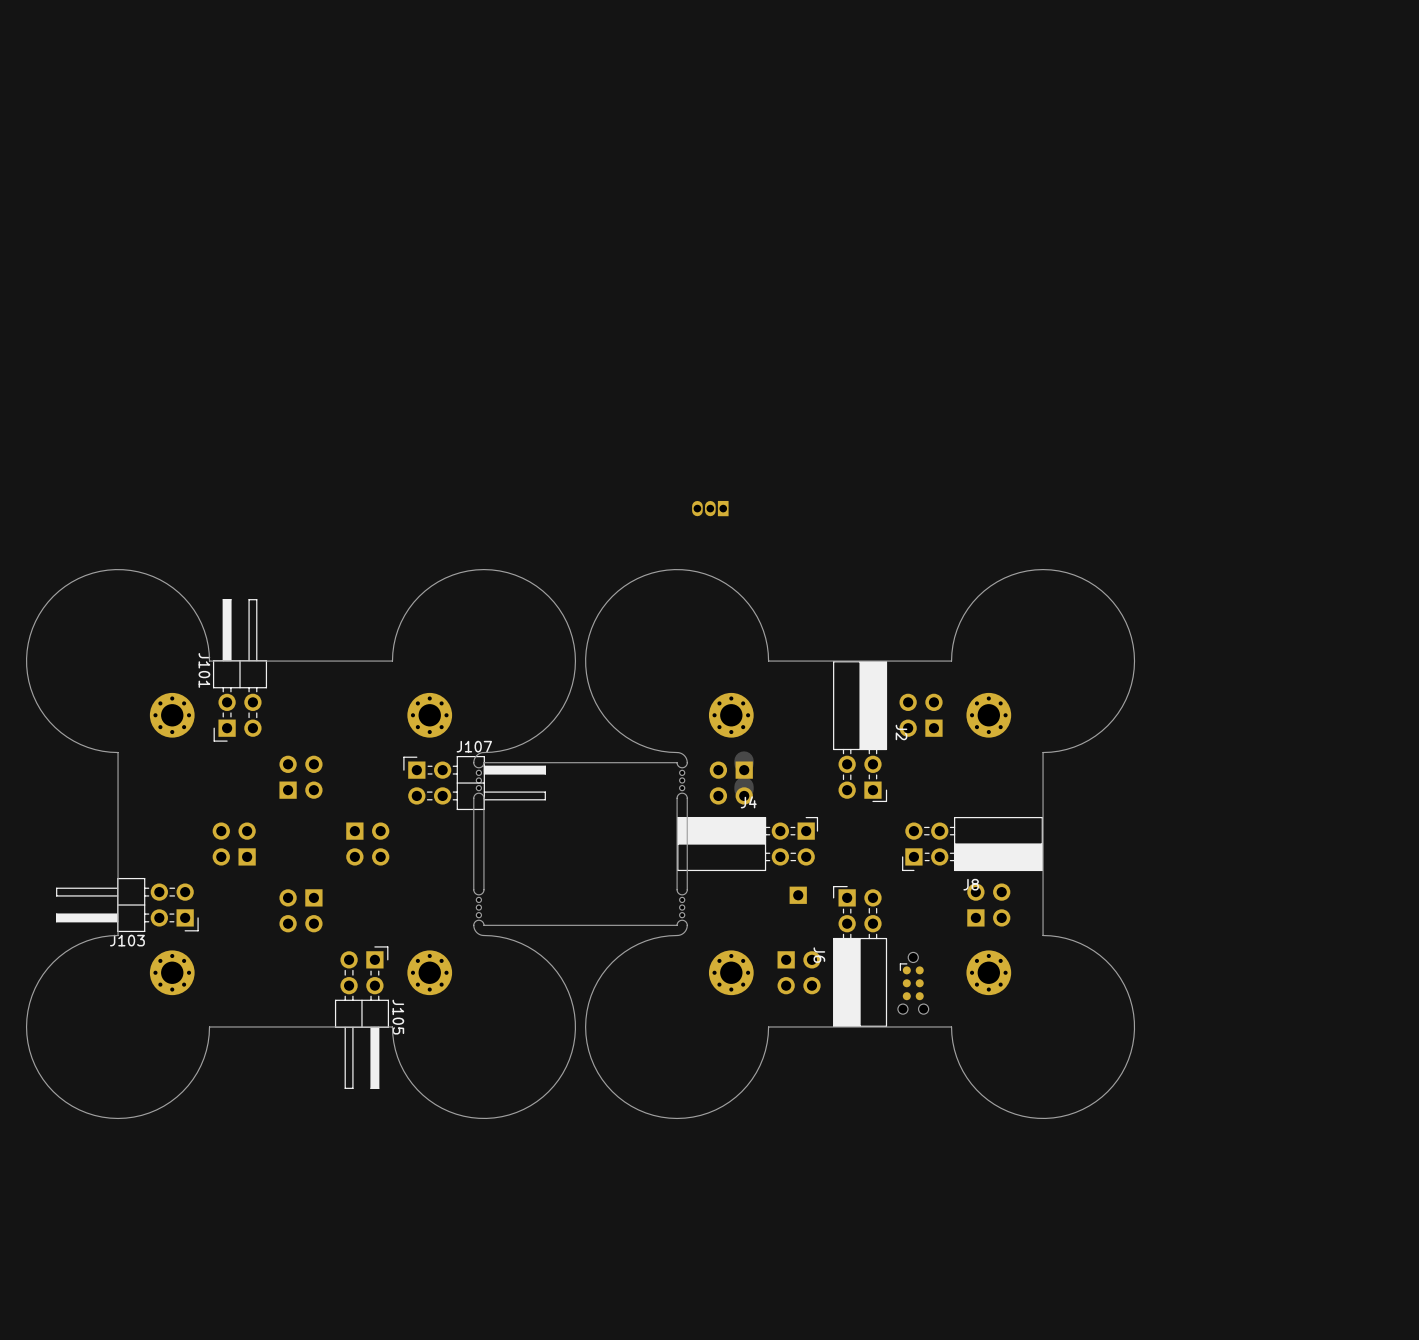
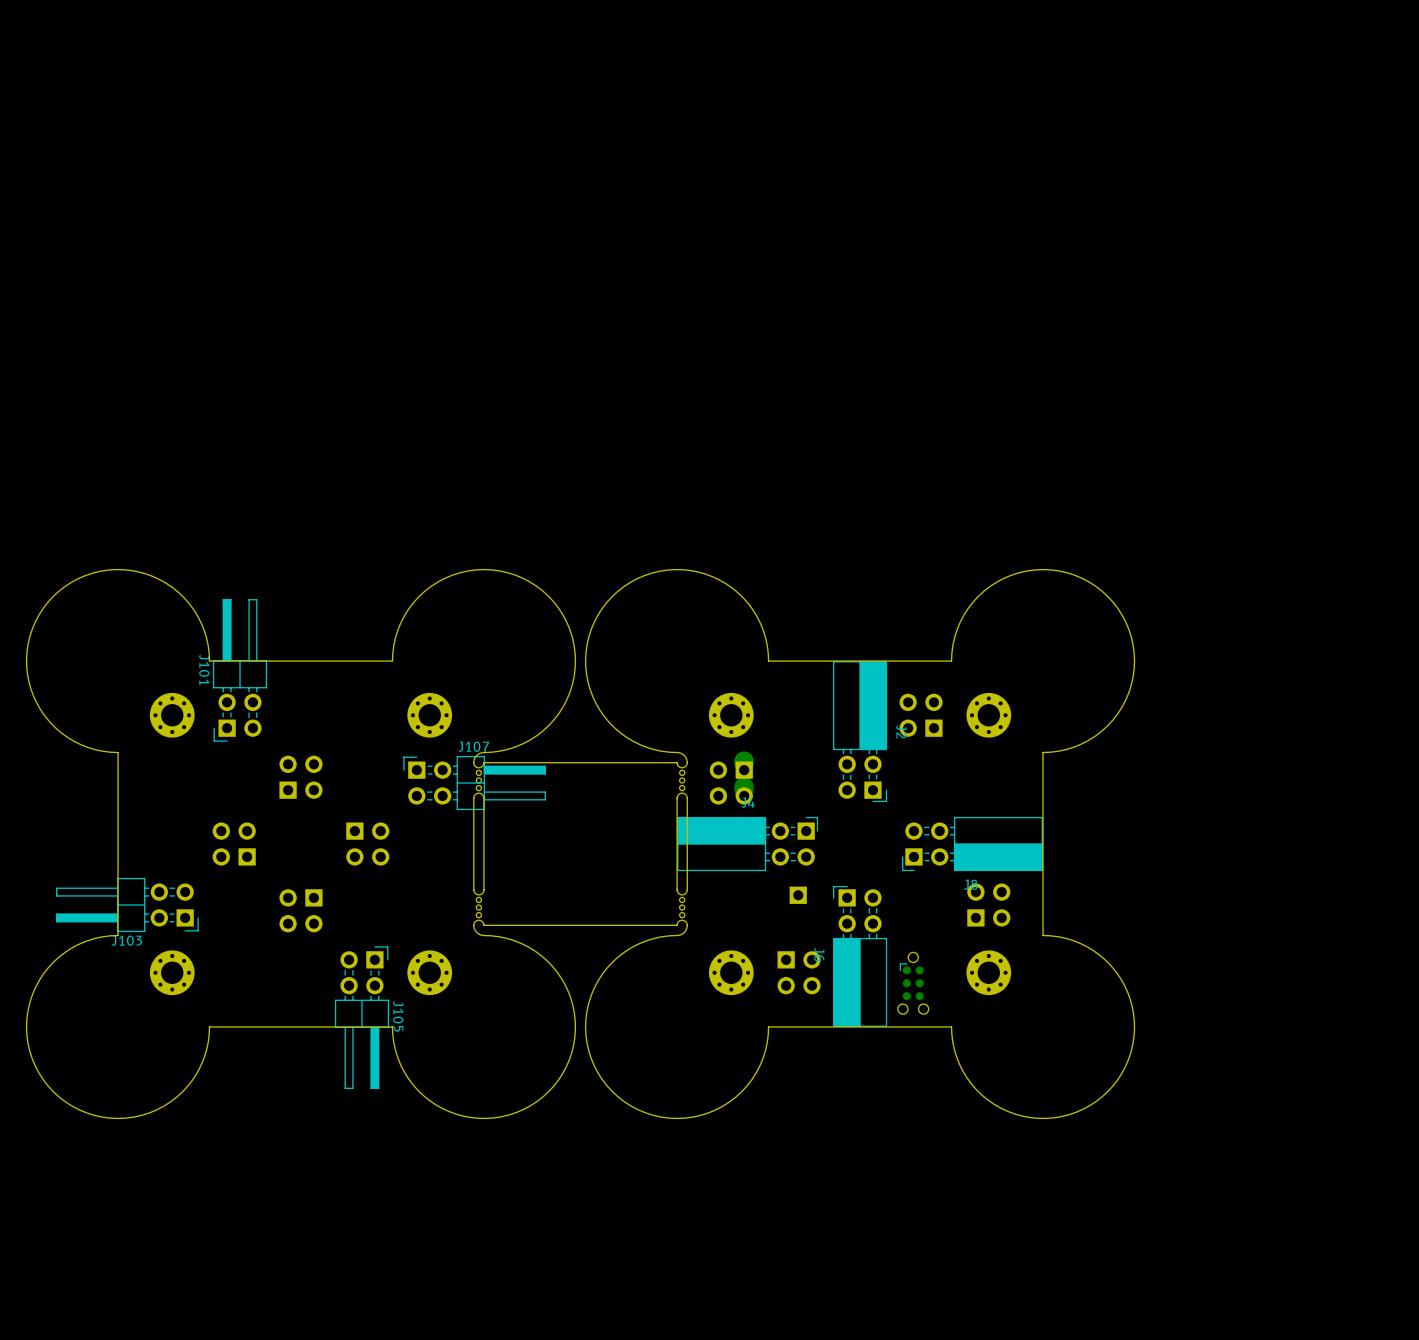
part: (710, 508) -> none

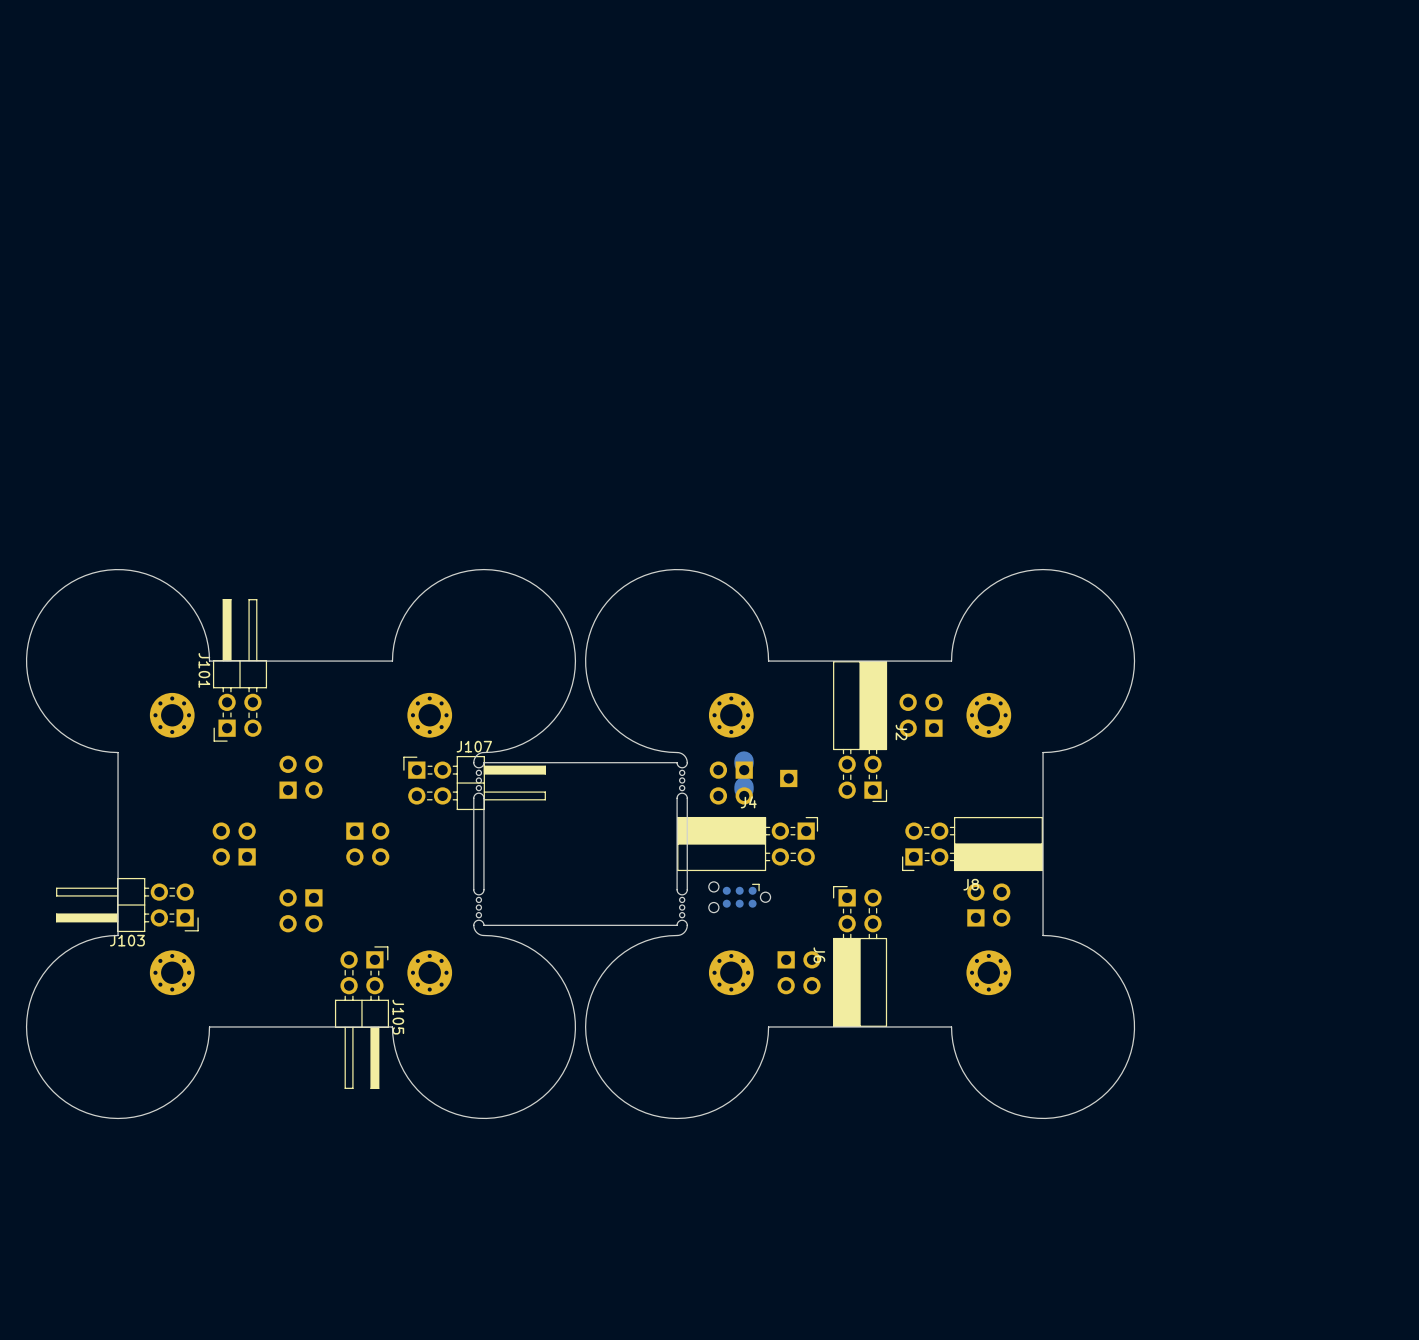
part position: (798, 895) -> (788, 778)
part rotation: 0° (913, 983) -> 90° clockwise (739, 897)
part position: (913, 983) -> (739, 897)

